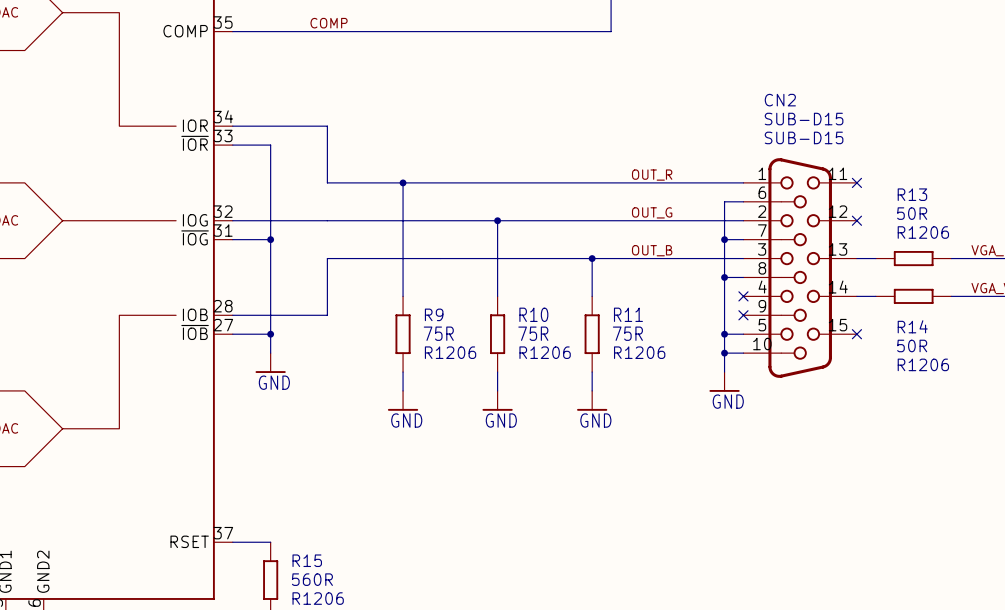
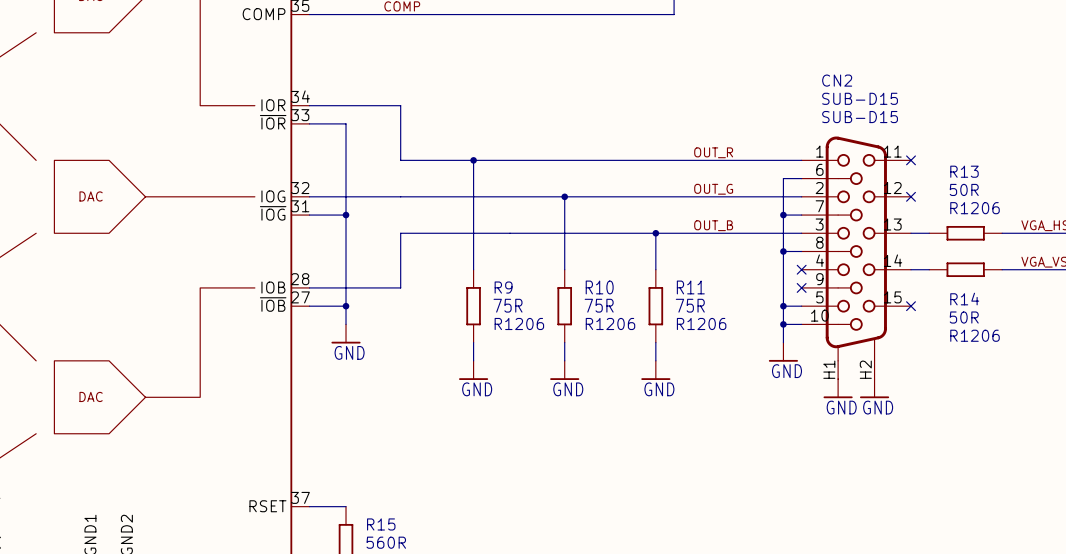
CN2 symbol: [743, 158, 857, 378] -> [801, 136, 912, 380]
power symbol: none -> GND (838, 388)
power symbol: none -> GND (874, 388)

